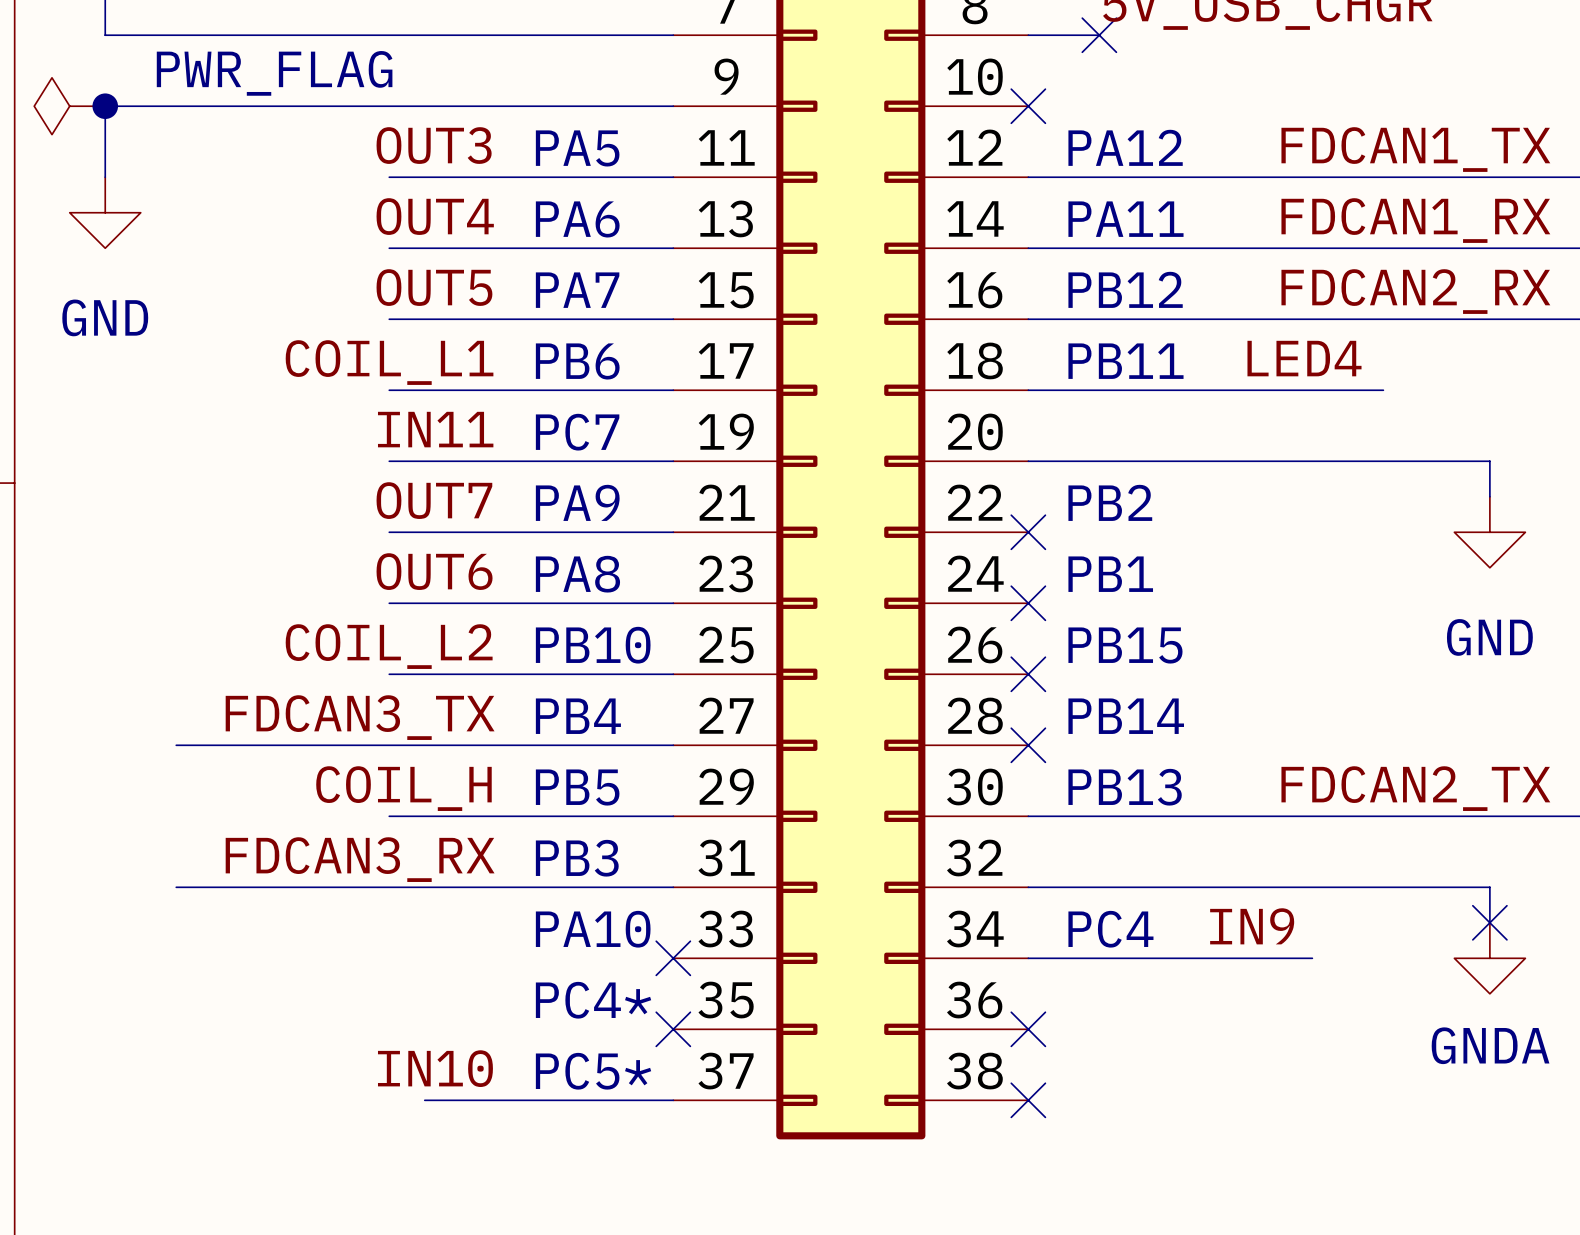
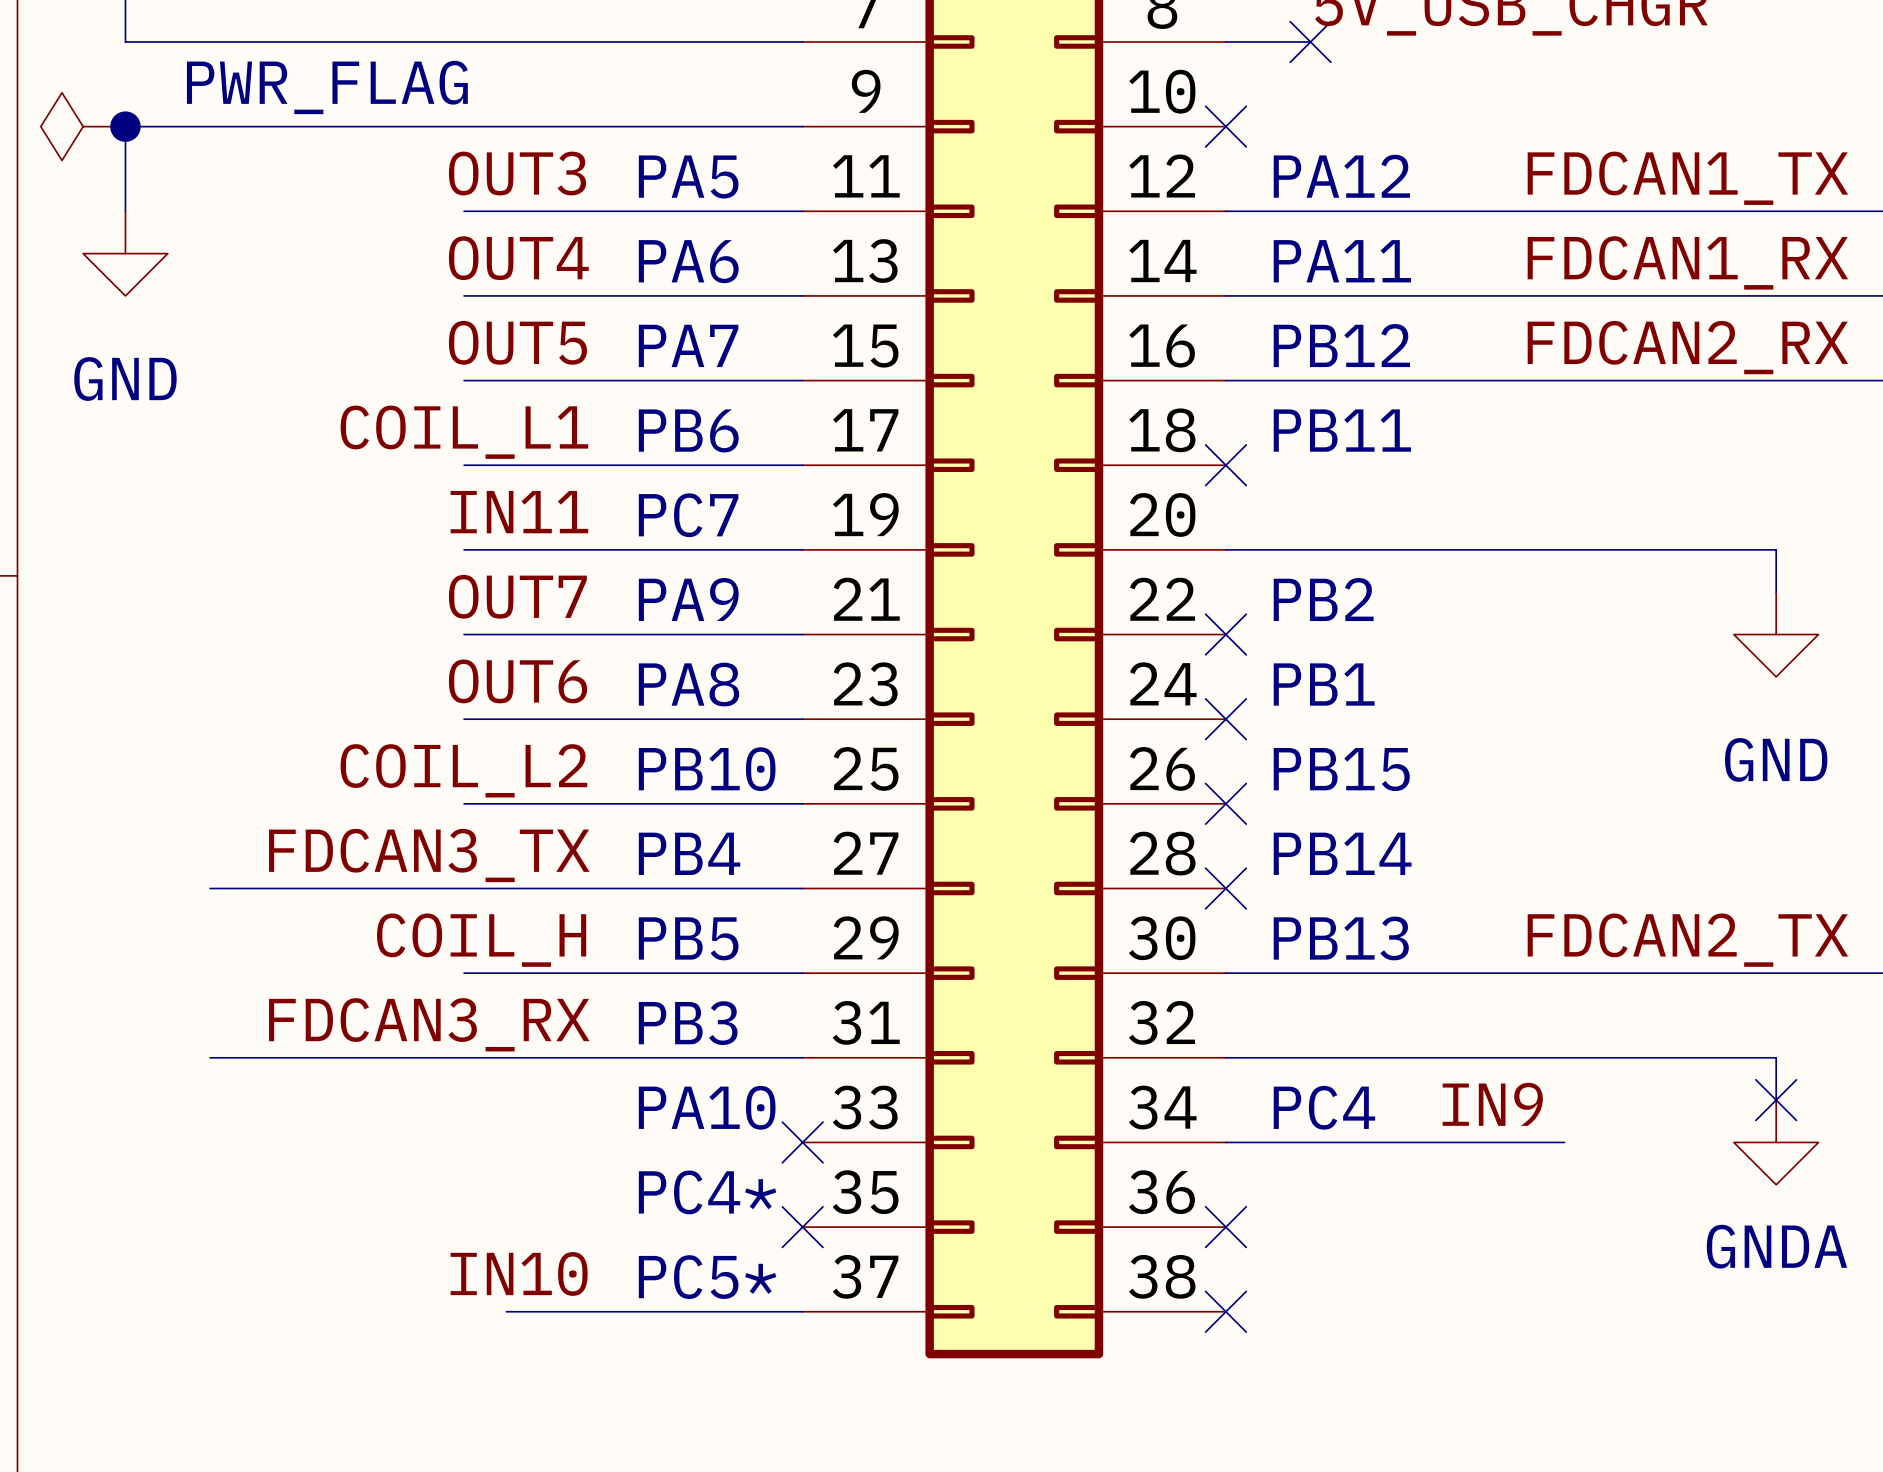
label: LED4 (1304, 358) -> none
wire: (1028, 390) (1383, 390) -> none
no-connect mark: none -> (1225, 465)

